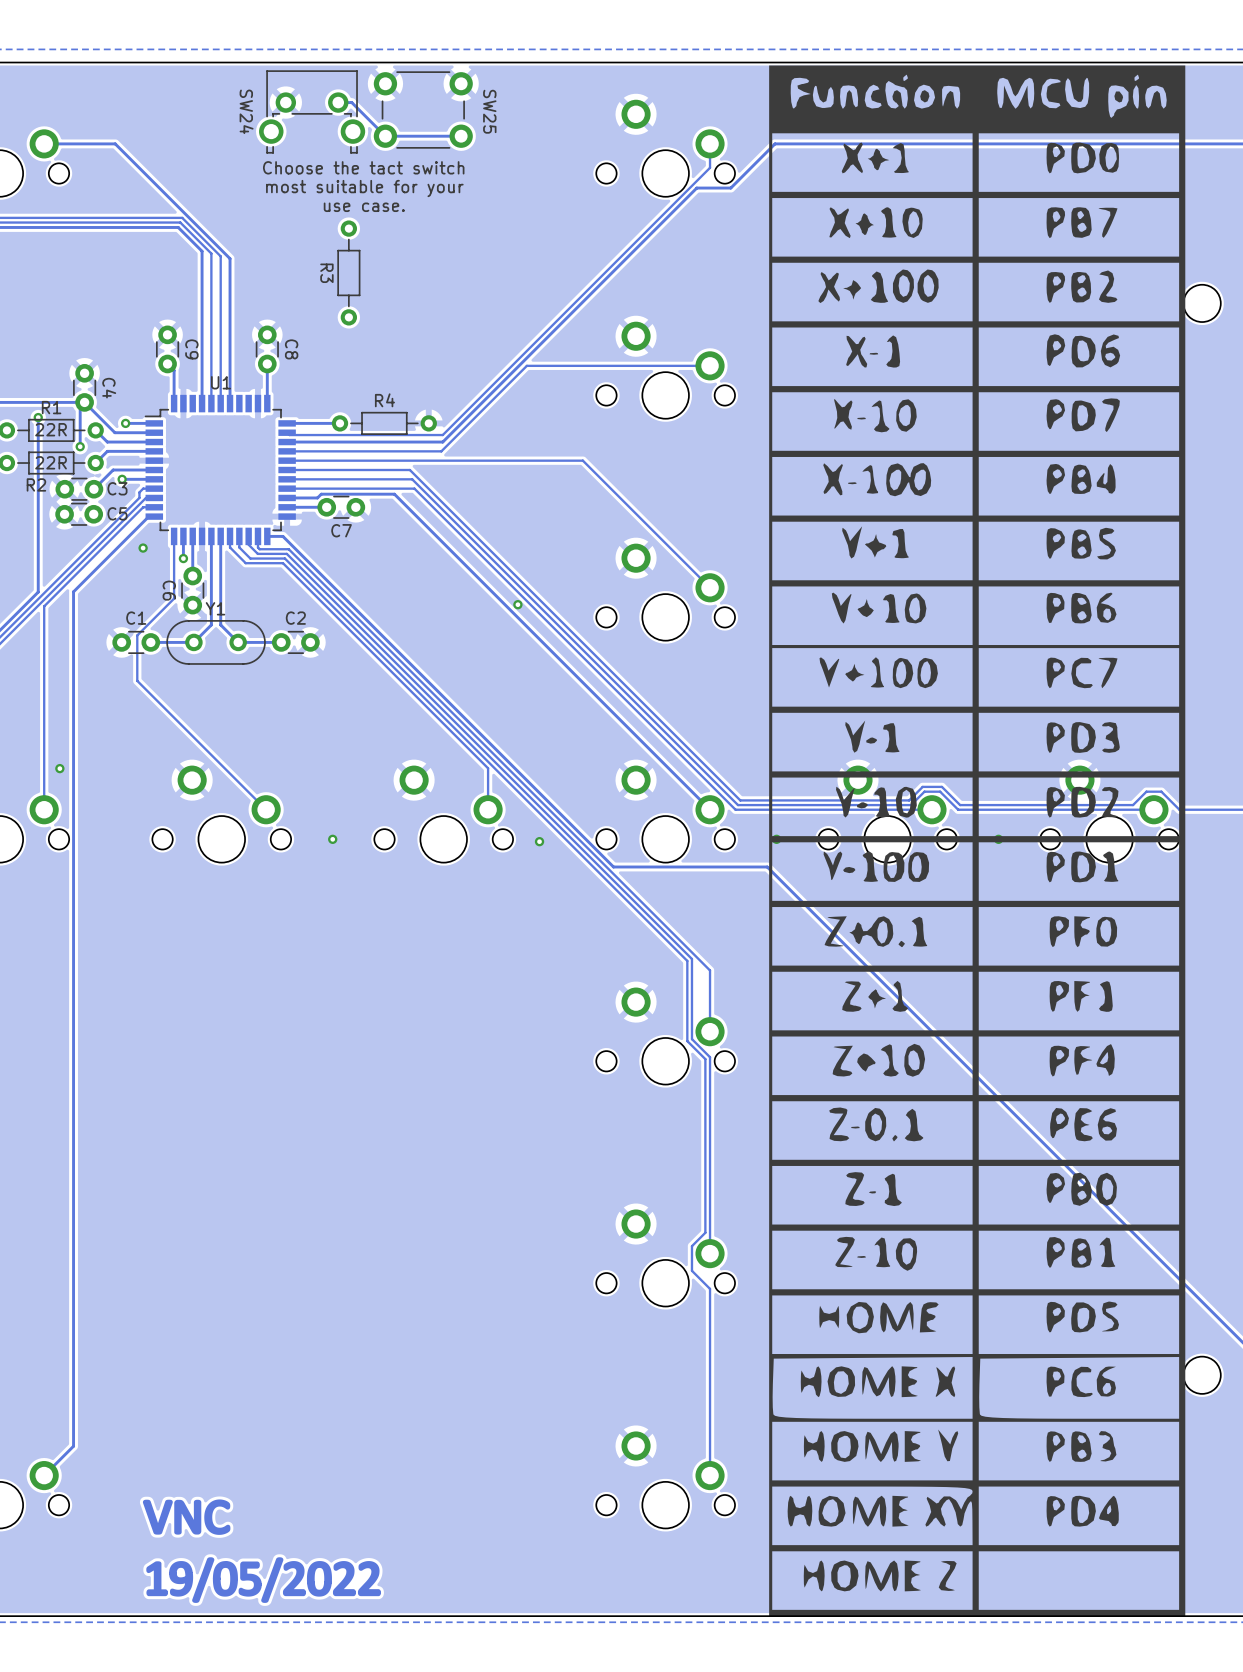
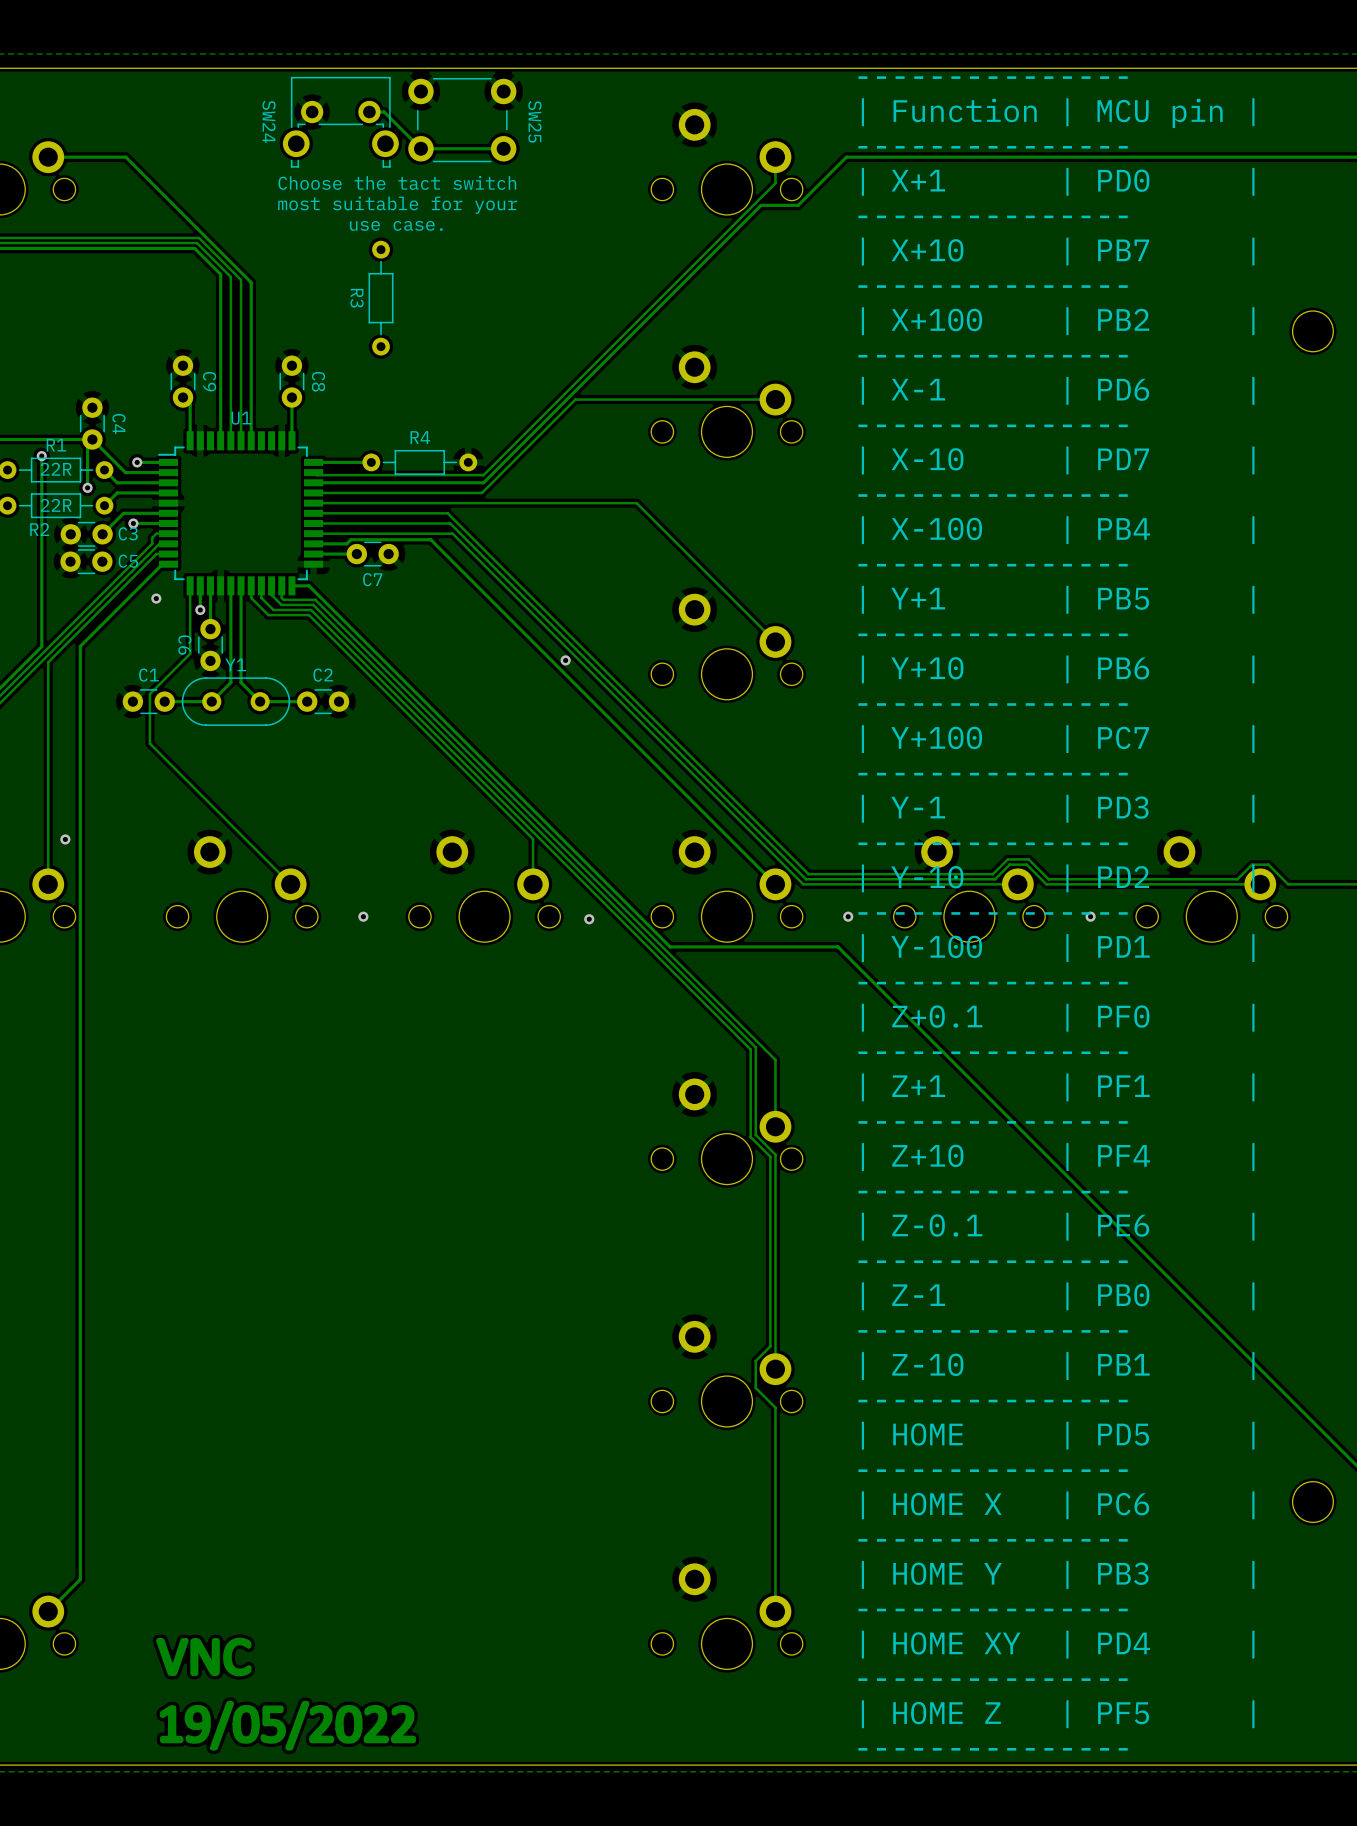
drawing: [769, 65, 1186, 1617] -> none
text: none -> --------------- (993, 77)
text: none -> | Function | MCU pin | (1058, 113)
text: none -> --------------- (993, 147)
text: none -> | X+1 | PD0 | (1058, 181)
text: none -> --------------- (993, 216)
text: none -> | X+10 | PB7 | (1058, 251)
text: none -> --------------- (993, 286)
text: none -> | X+100 | PB2 | (1058, 321)
text: none -> --------------- (993, 356)
text: none -> | X-1 | PD6 | (1058, 390)
text: none -> --------------- (993, 425)
text: none -> | X-10 | PD7 | (1058, 460)
text: none -> --------------- (993, 495)
text: none -> | X-100 | PB4 | (1058, 530)
text: none -> --------------- (993, 565)
text: none -> | Y+1 | PB5 | (1058, 599)
text: none -> --------------- (993, 634)
text: none -> | Y+10 | PB6 | (1058, 669)
text: none -> --------------- (993, 704)
text: none -> | Y+100 | PC7 | (1058, 739)
text: none -> --------------- (993, 774)
text: none -> | Y-1 | PD3 | (1058, 808)
text: none -> --------------- (993, 843)
text: none -> | Y-10 | PD2 | (1058, 878)
text: none -> --------------- (993, 913)
text: none -> | Y-100 | PD1 | (1058, 948)
text: none -> --------------- (993, 983)
text: none -> | Z+0.1 | PF0 | (1058, 1017)
text: none -> --------------- (993, 1052)
text: none -> | Z+1 | PF1 | (1058, 1087)
text: none -> --------------- (993, 1122)
text: none -> | Z+10 | PF4 | (1058, 1157)
text: none -> --------------- (993, 1192)
text: none -> | Z-0.1 | PE6 | (1058, 1226)
text: none -> --------------- (993, 1261)
text: none -> | Z-1 | PB0 | (1058, 1296)
text: none -> --------------- (993, 1331)
text: none -> | Z-10 | PB1 | (1058, 1365)
text: none -> --------------- (993, 1401)
text: none -> | HOME | PD5 | (1058, 1435)
text: none -> --------------- (993, 1470)
text: none -> | HOME X | PC6 | (1058, 1505)
text: none -> --------------- (993, 1540)
text: none -> | HOME Y | PB3 | (1058, 1574)
text: none -> --------------- (993, 1610)
text: none -> | HOME XY | PD4 | (1058, 1644)
text: none -> --------------- (993, 1679)
text: none -> | HOME Z | PF5 | (1058, 1714)
text: none -> --------------- (993, 1749)

